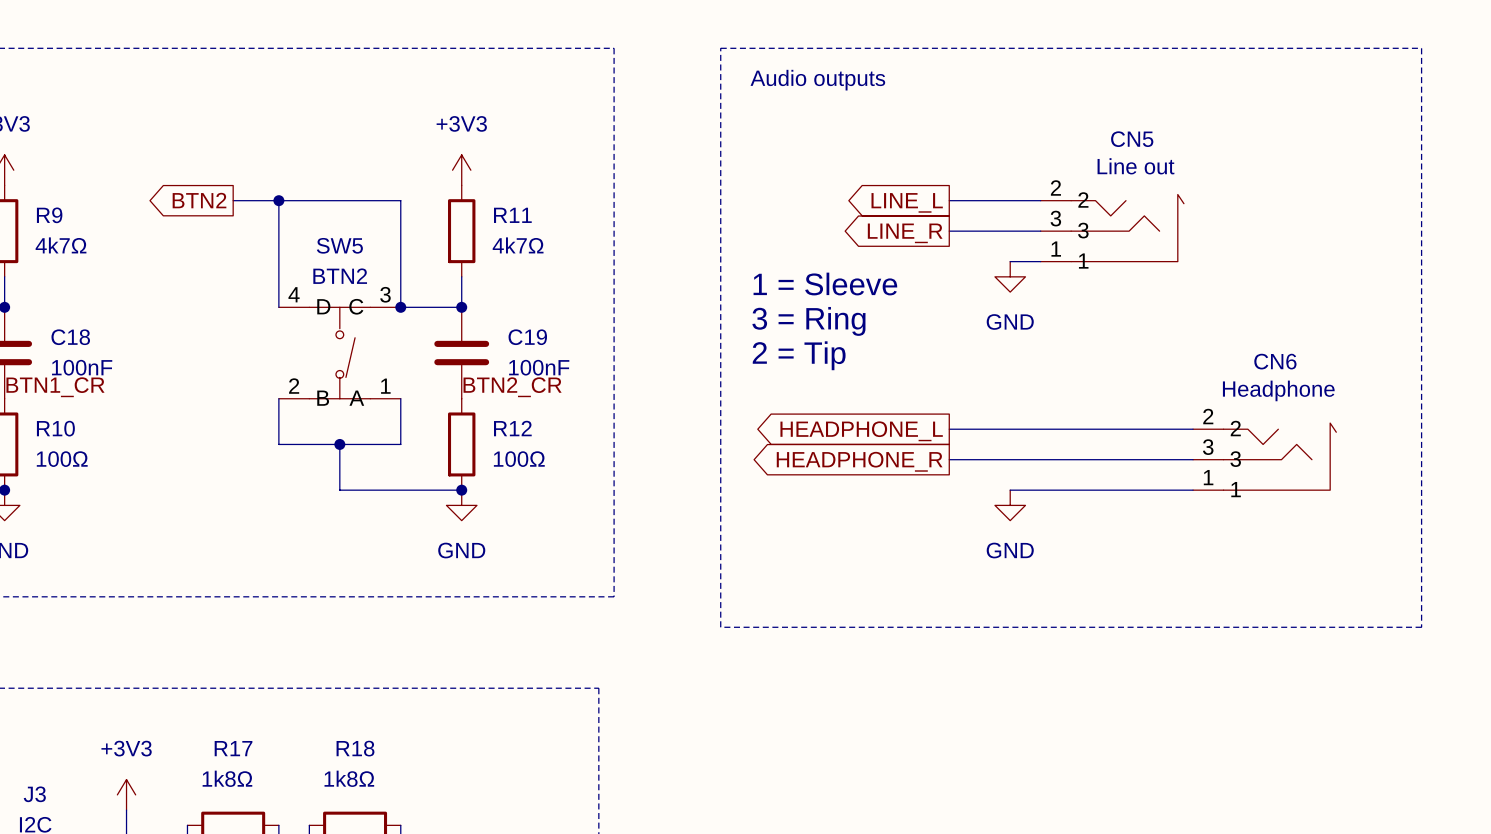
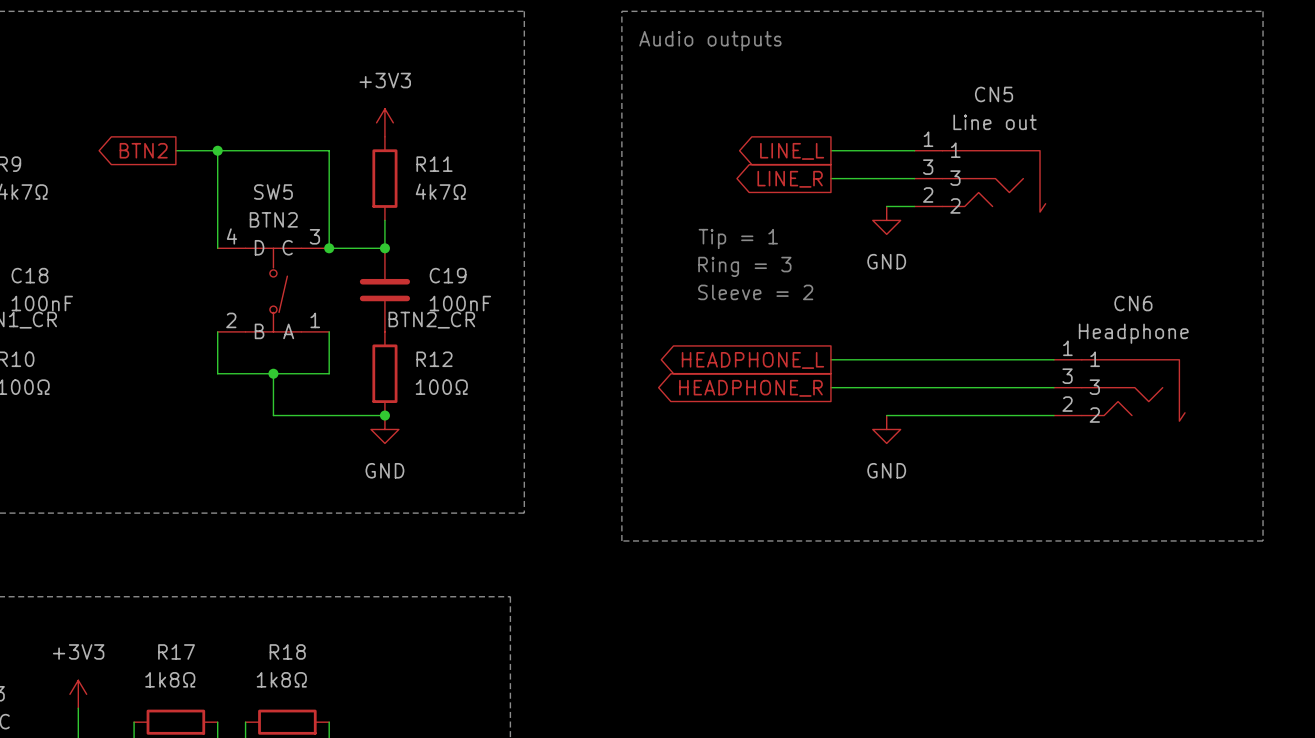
CN5 flip: as is (1127, 228) -> up-down (994, 181)
text: 1 = Sleeve (825, 284) -> none
text: none -> Tip = 1 (738, 238)
text: 3 = Ring (808, 321) -> none
text: none -> Ring = 3 (744, 266)
text: 2 = Tip (799, 355) -> none
text: none -> Sleeve = 2 (755, 292)
CN6 flip: as is (1279, 456) -> up-down (1133, 390)

